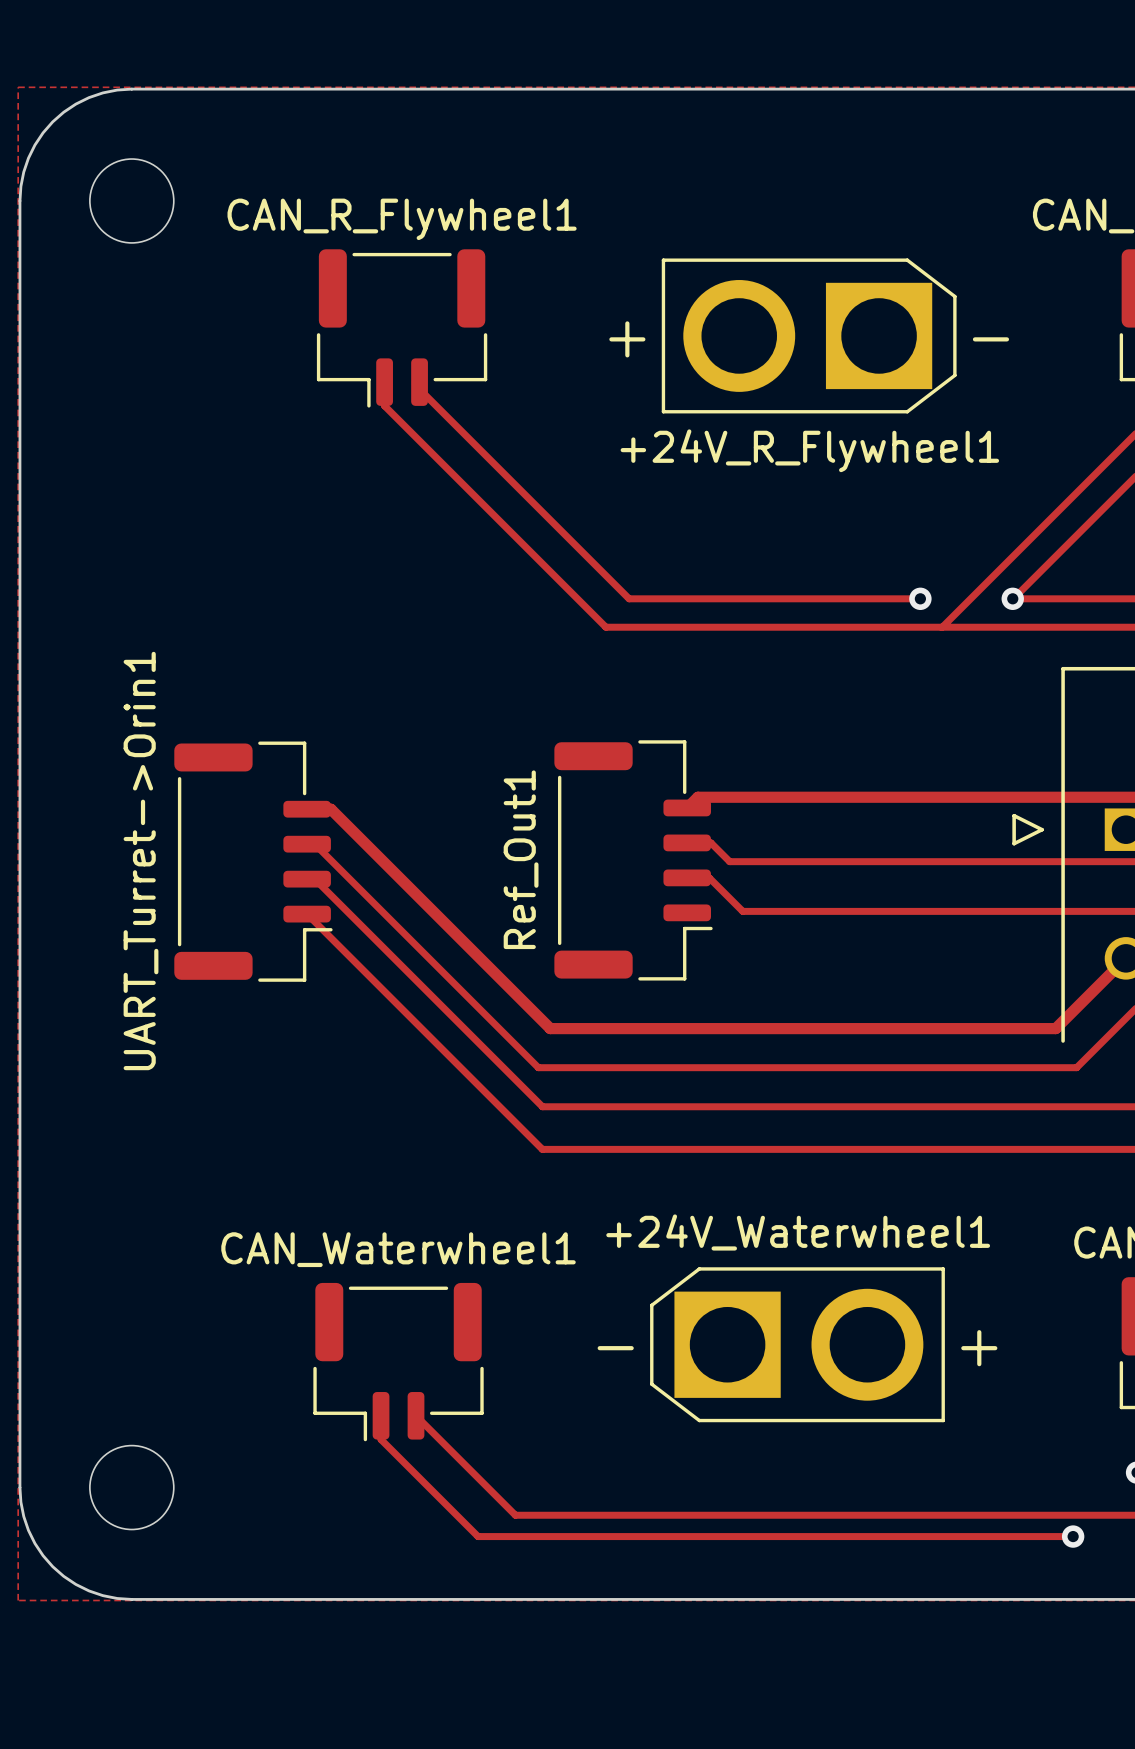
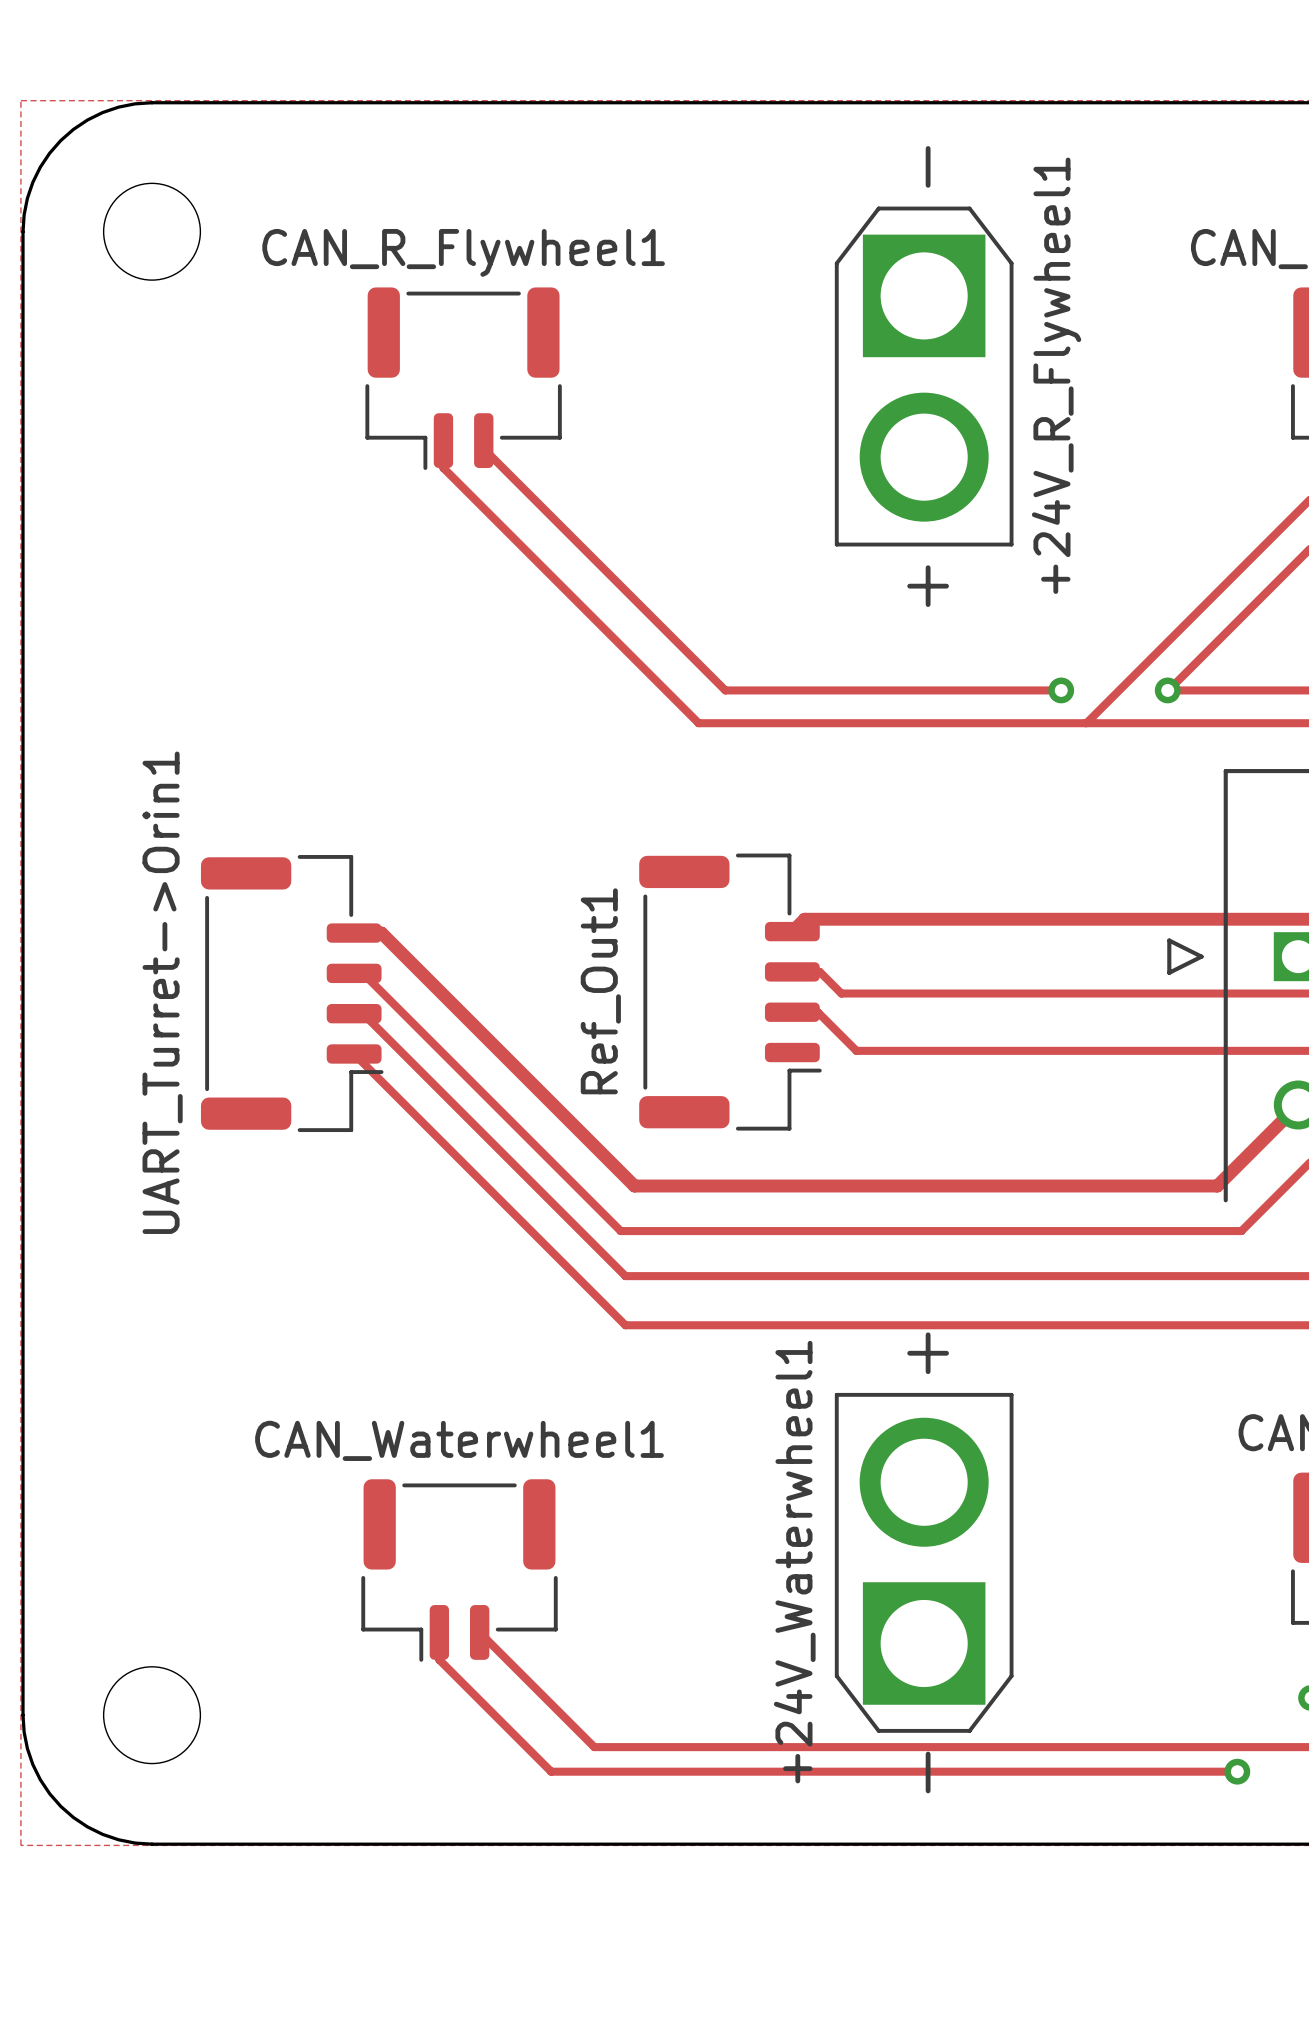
+24V_R_Flywheel1 rotation: 0° (809, 335) -> 90° counterclockwise (924, 376)
+24V_Waterwheel1 rotation: 0° (797, 1344) -> 90° counterclockwise (924, 1562)

